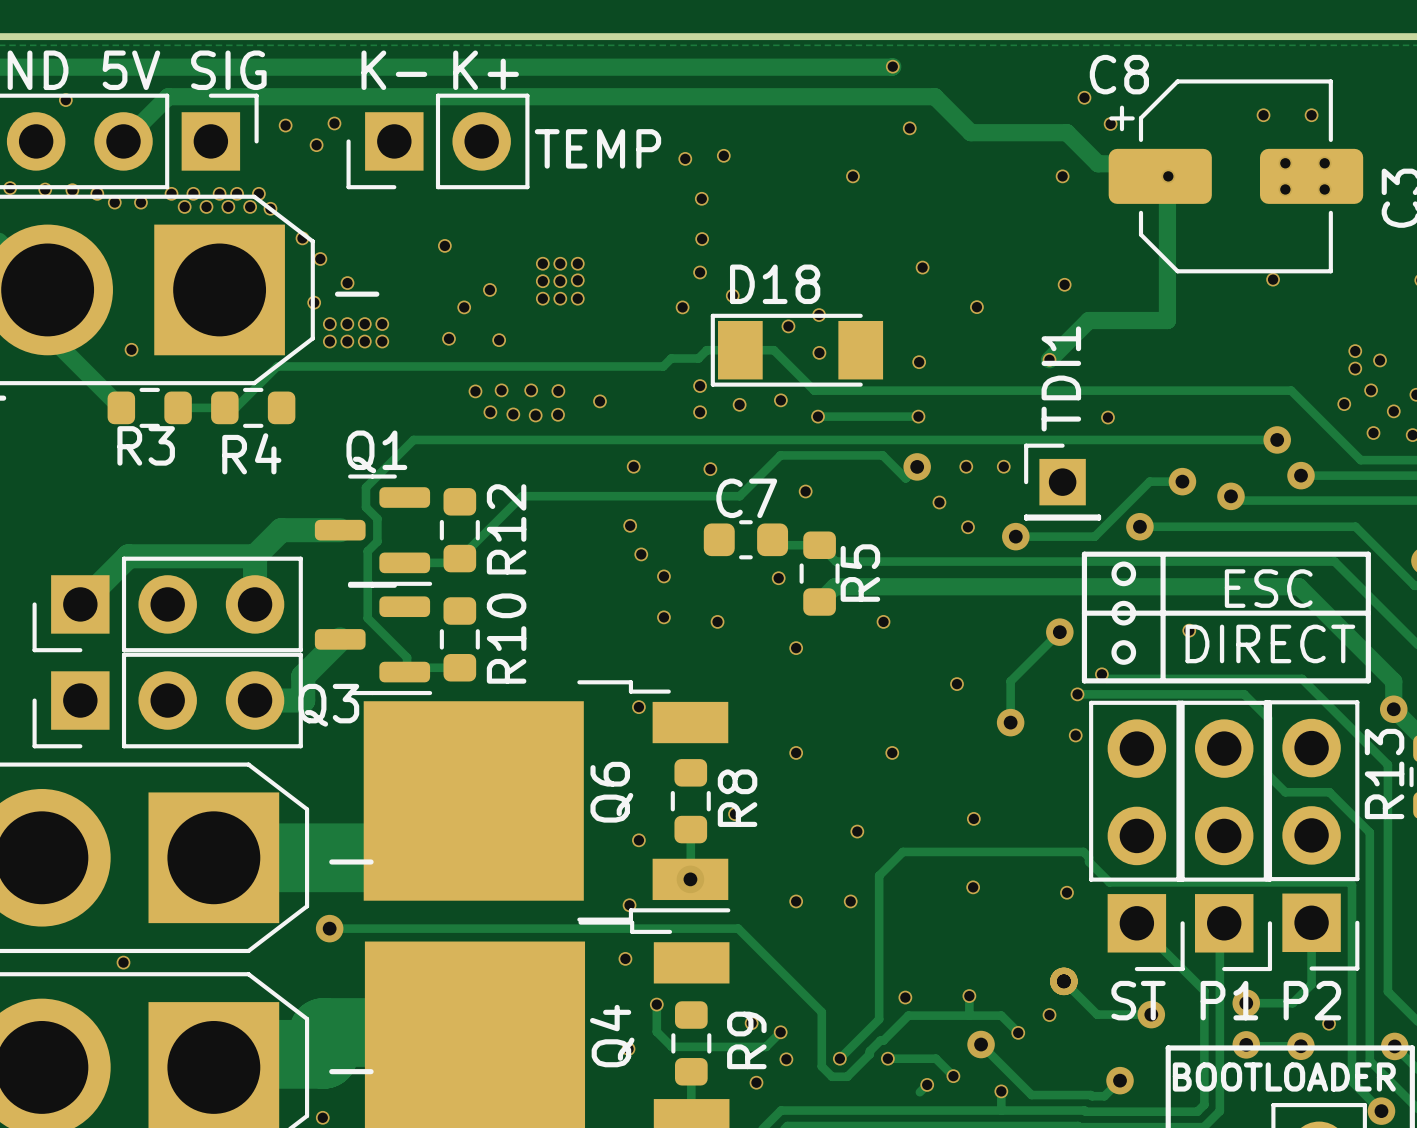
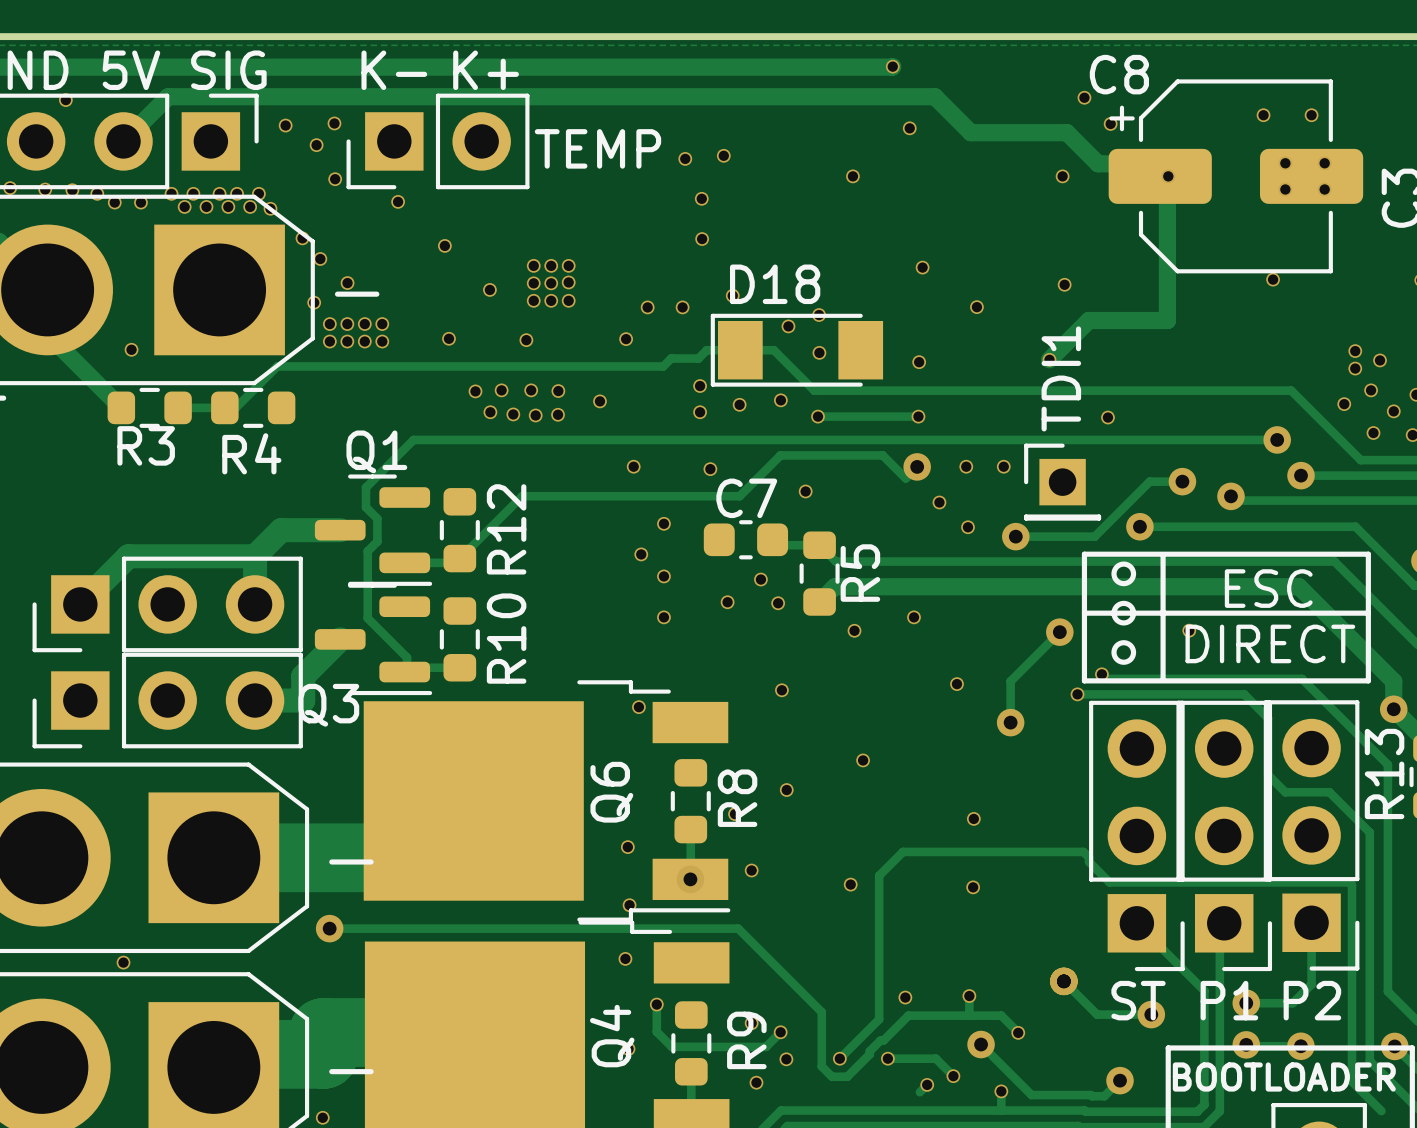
via: none -> (335, 179)
via: none -> (398, 201)
via: (542, 263) -> none
via: (560, 263) -> none
via: (577, 263) -> none
via: none -> (533, 265)
via: none -> (551, 265)
via: none -> (568, 265)
via: (700, 272) -> none
via: (577, 280) -> none
via: (542, 281) -> none
via: (560, 281) -> none
via: none -> (568, 282)
via: none -> (533, 283)
via: none -> (551, 283)
via: (542, 298) -> none
via: (560, 298) -> none
via: (577, 298) -> none
via: none -> (533, 300)
via: none -> (551, 300)
via: none -> (568, 300)
via: (464, 307) -> none
via: none -> (647, 307)
via: none -> (626, 339)
via: (499, 340) -> none
via: none -> (526, 340)
via position: (630, 525) -> (663, 523)
via: (778, 578) -> none
via: none -> (760, 579)
via: none -> (778, 603)
via: none -> (914, 617)
via position: (717, 621) -> (727, 602)
via: (883, 621) -> none
via: none -> (854, 630)
via: (796, 648) -> none
via: none -> (781, 690)
via: (1075, 735) -> none
via: (796, 752) -> none
via position: (892, 752) -> (863, 760)
via: none -> (786, 790)
via: (857, 831) -> none
via position: (638, 840) -> (627, 847)
via: none -> (751, 870)
via: (1066, 892) -> none
via: (796, 901) -> none
via position: (850, 901) -> (850, 884)
via: (1049, 1015) -> none
via: (1329, 1023) -> none
via: (1381, 1111) -> none

